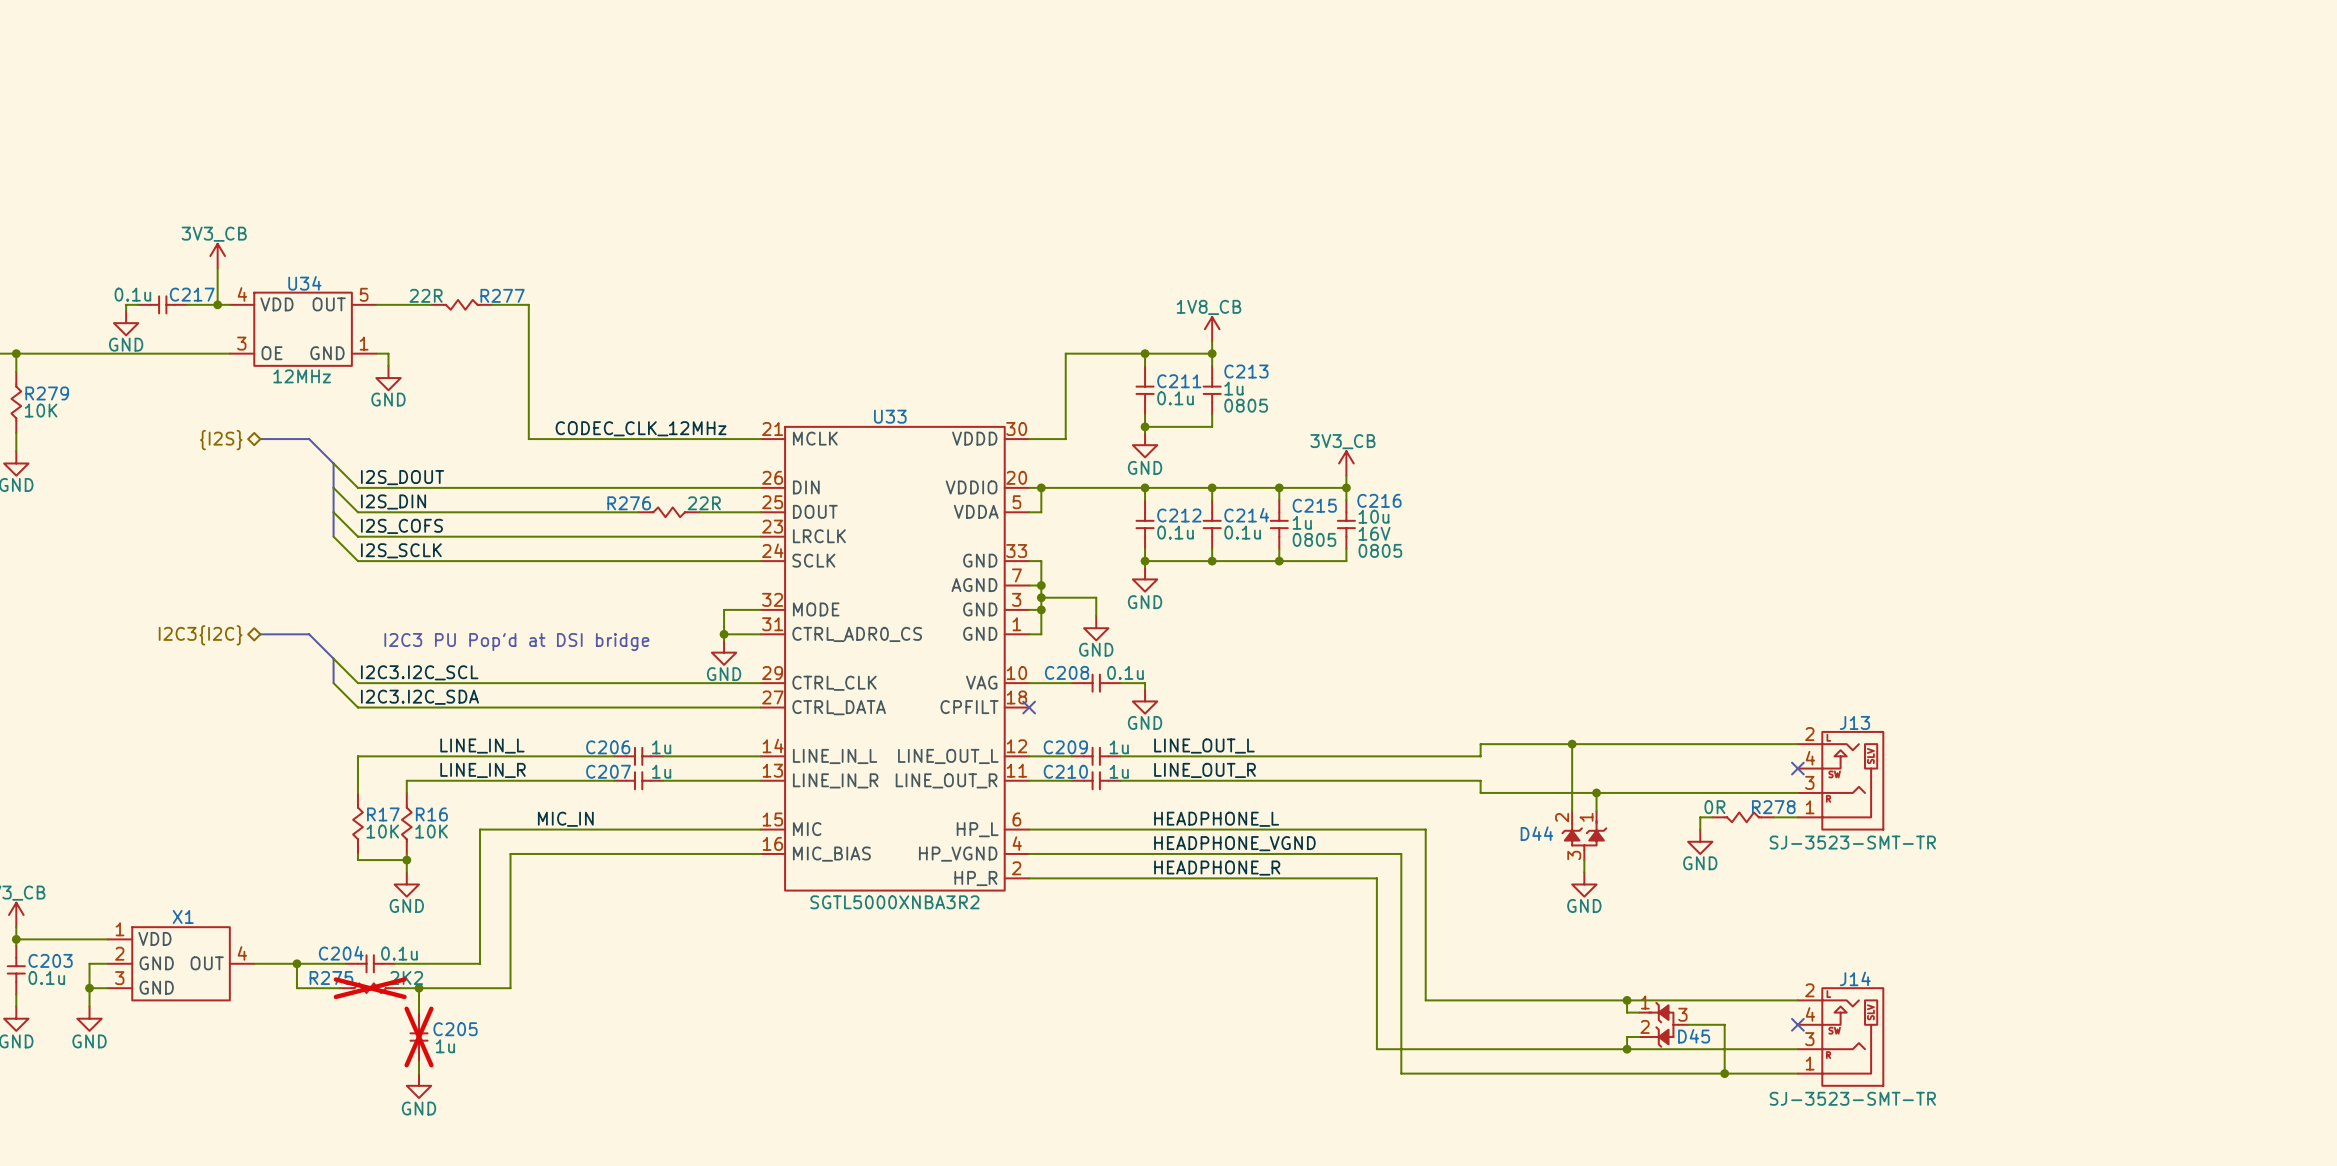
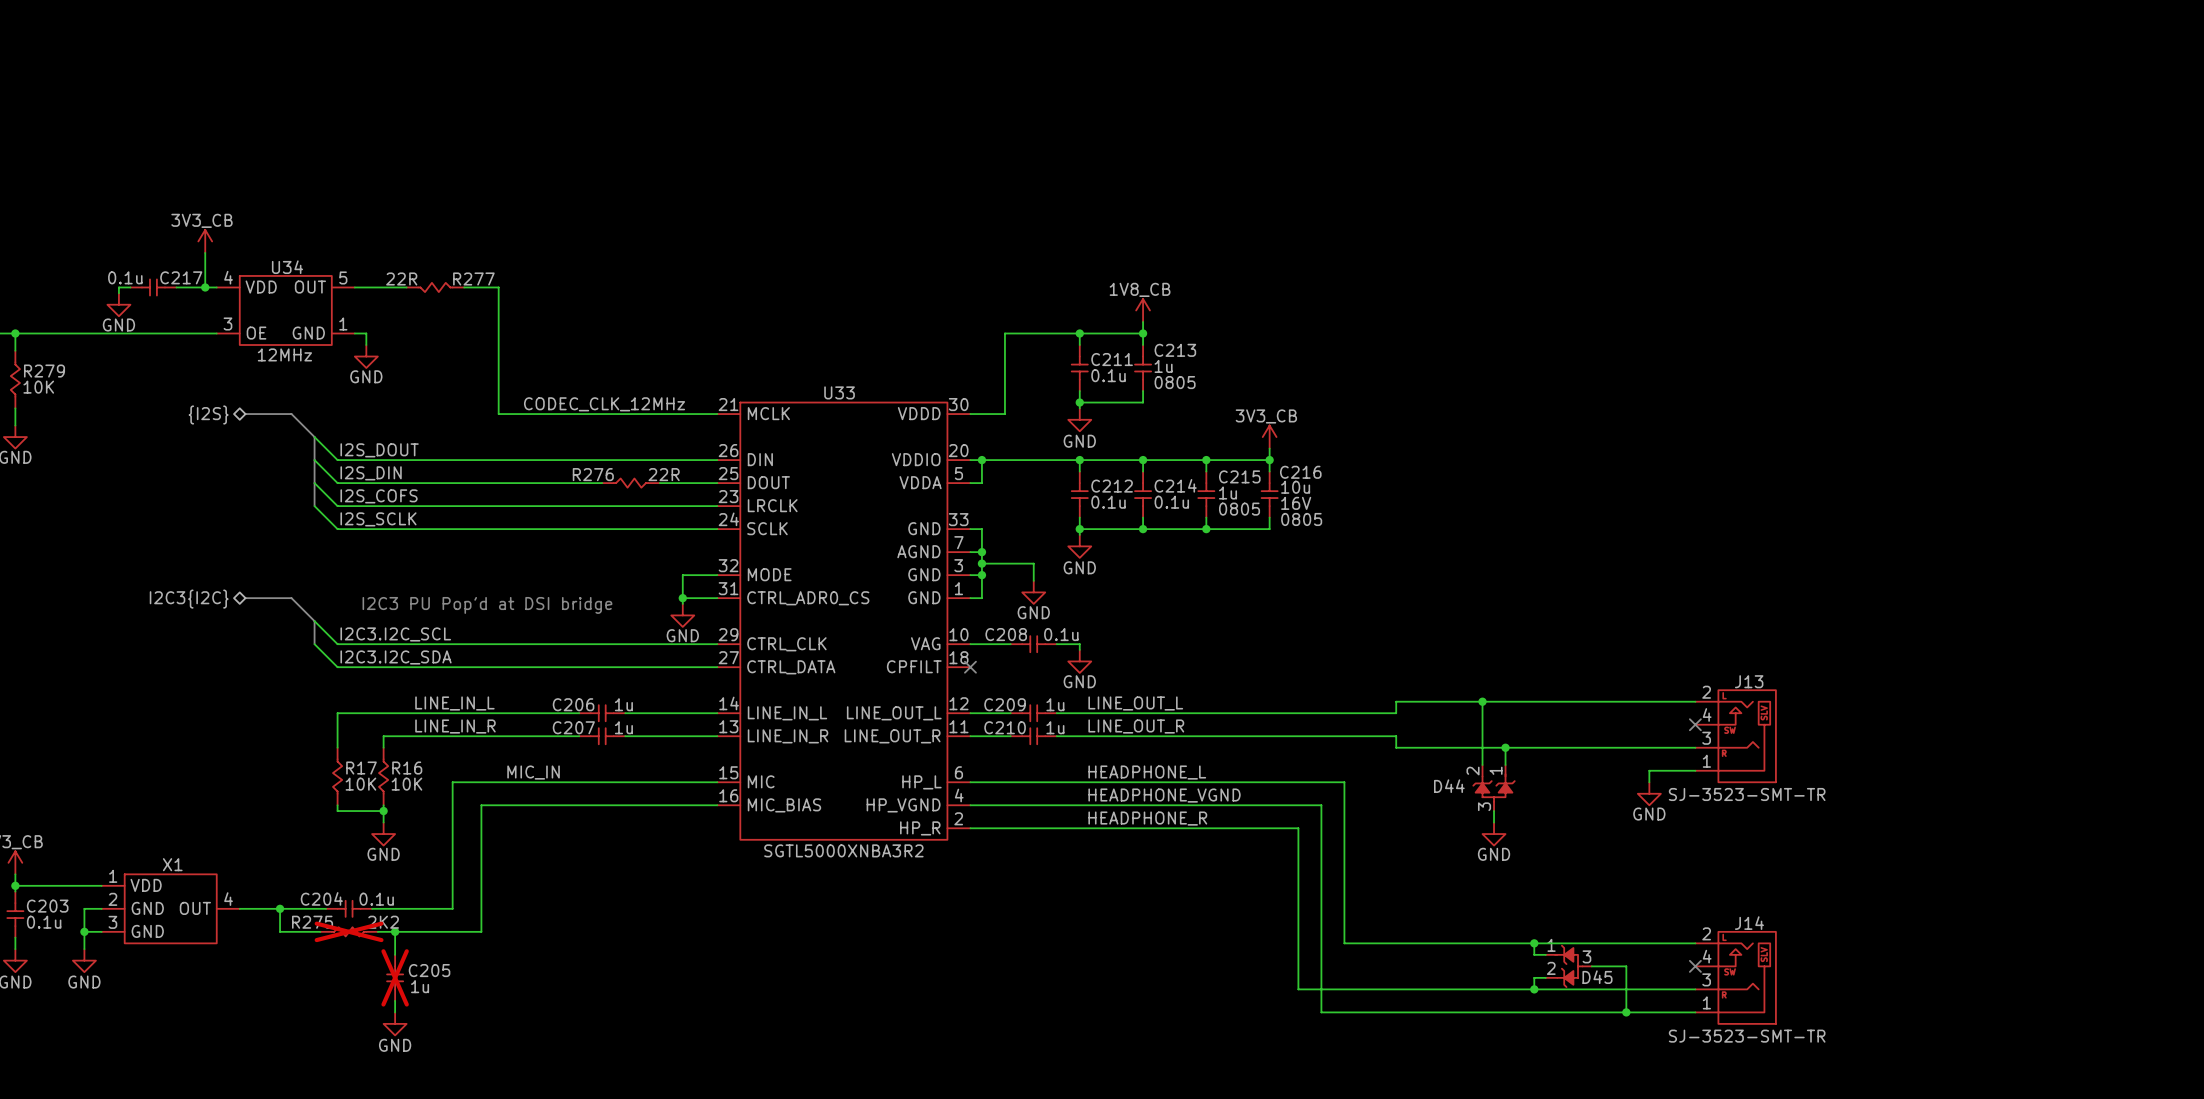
wire: (1712, 817) (1700, 817) (1700, 829) -> none
R278: 0R (1742, 817) -> none
power symbol position: GND (1700, 841) -> GND (1649, 793)

